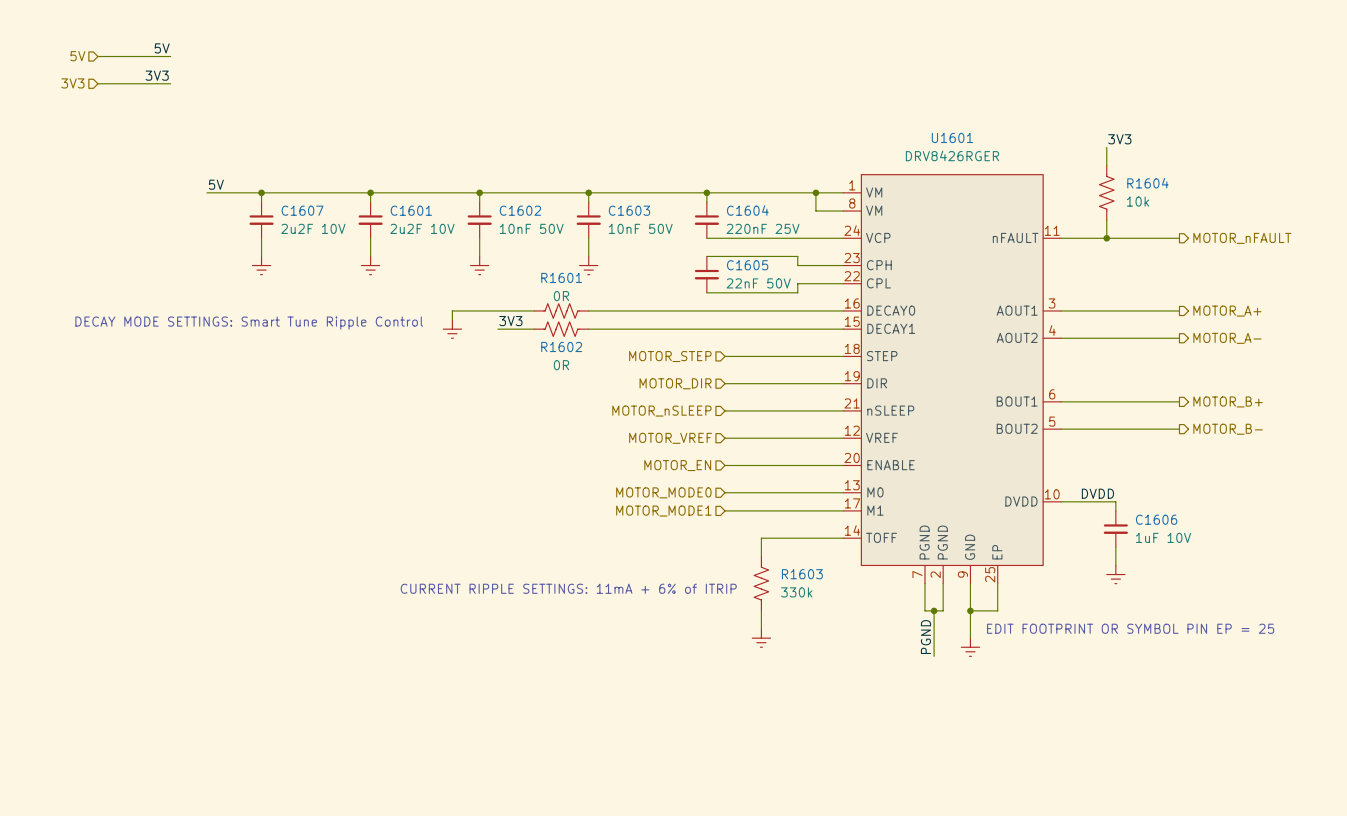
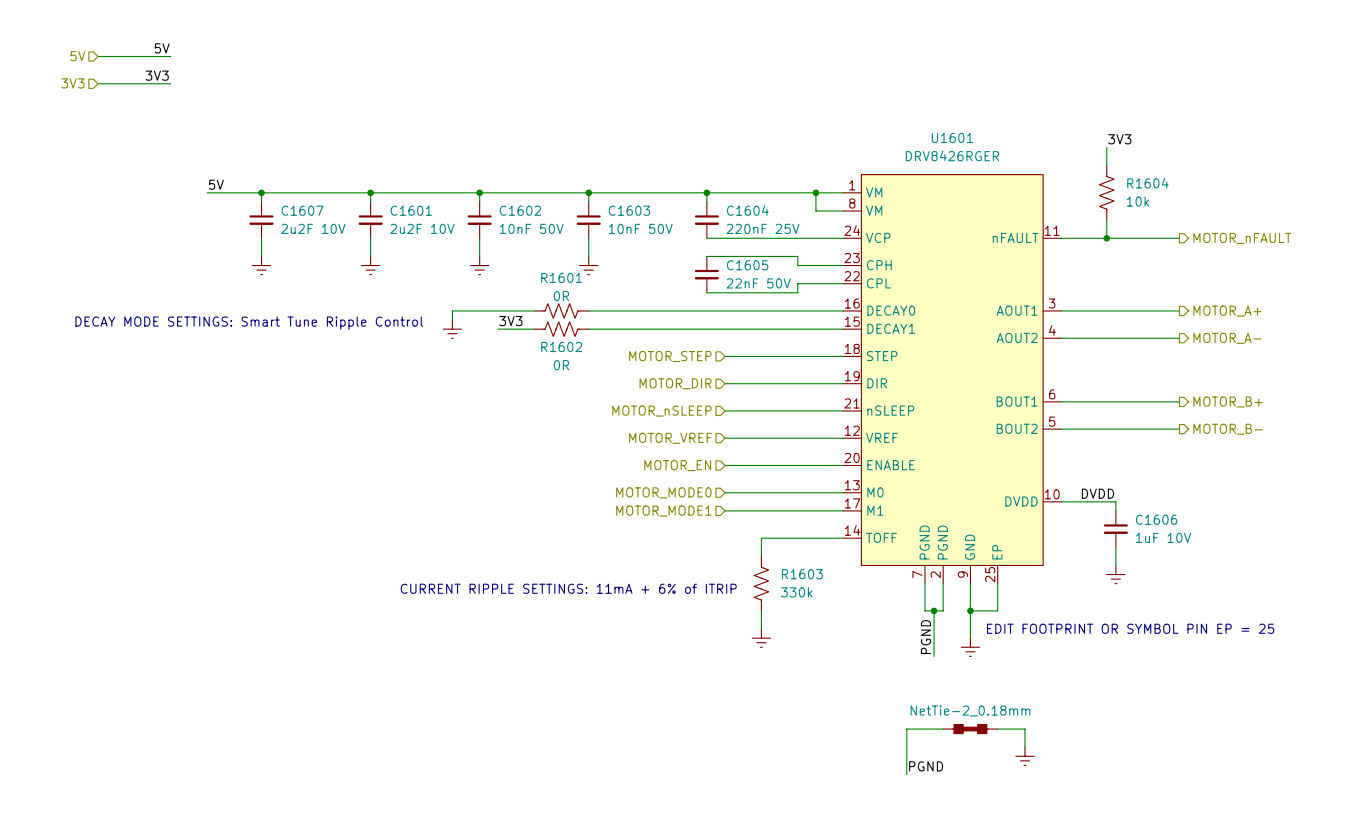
wire: none -> (943, 729) (906, 729) (906, 774)
part: none -> NetTie-2_0.18mm (970, 729)
wire: none -> (997, 729) (1024, 729) (1024, 747)
power symbol: none -> (1024, 756)
label: none -> PGND (926, 766)

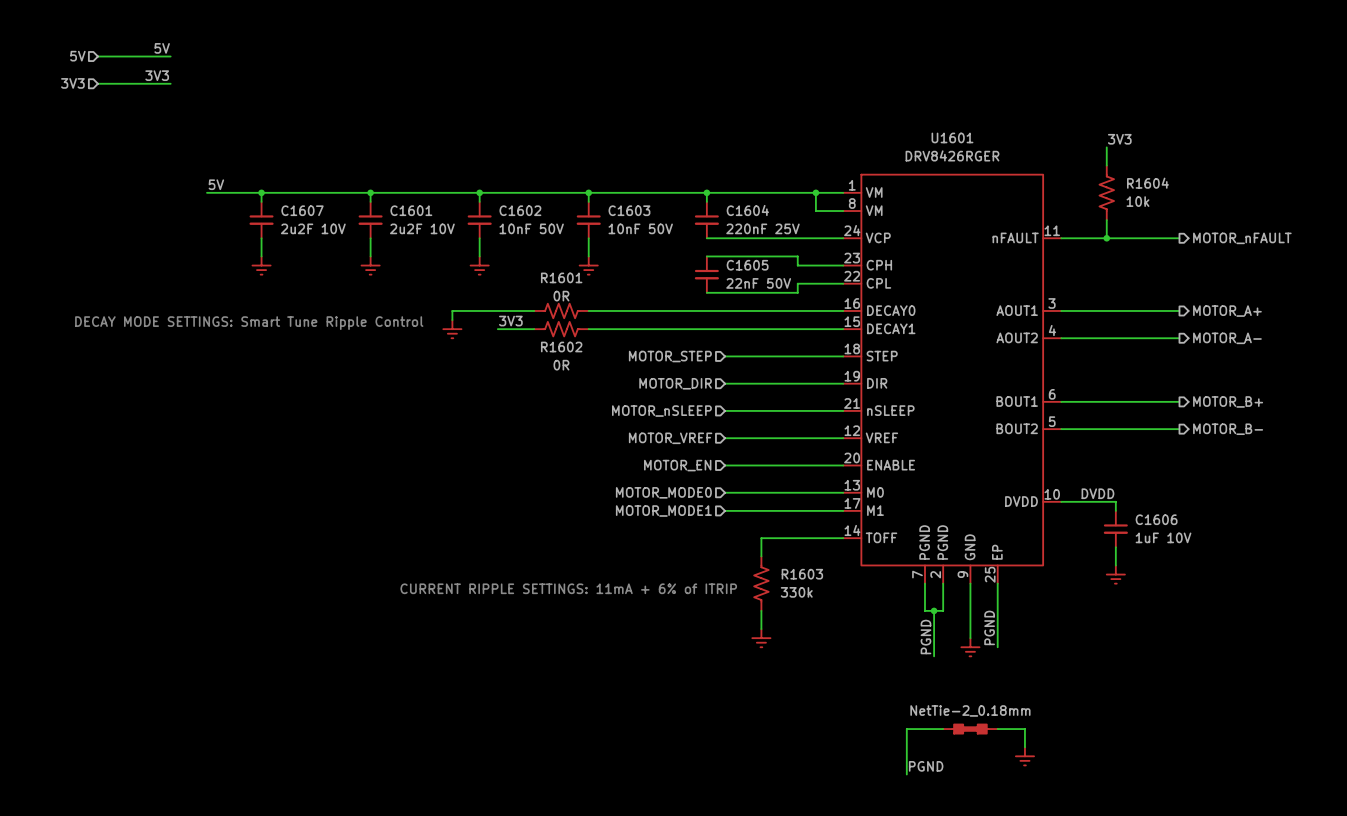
wire: (970, 610) (997, 610) -> (997, 647) (997, 610)
junction: (970, 610) -> none
label: none -> PGND (989, 627)
text: EDIT FOOTPRINT OR SYMBOL PIN EP = 25 (1130, 628) -> none

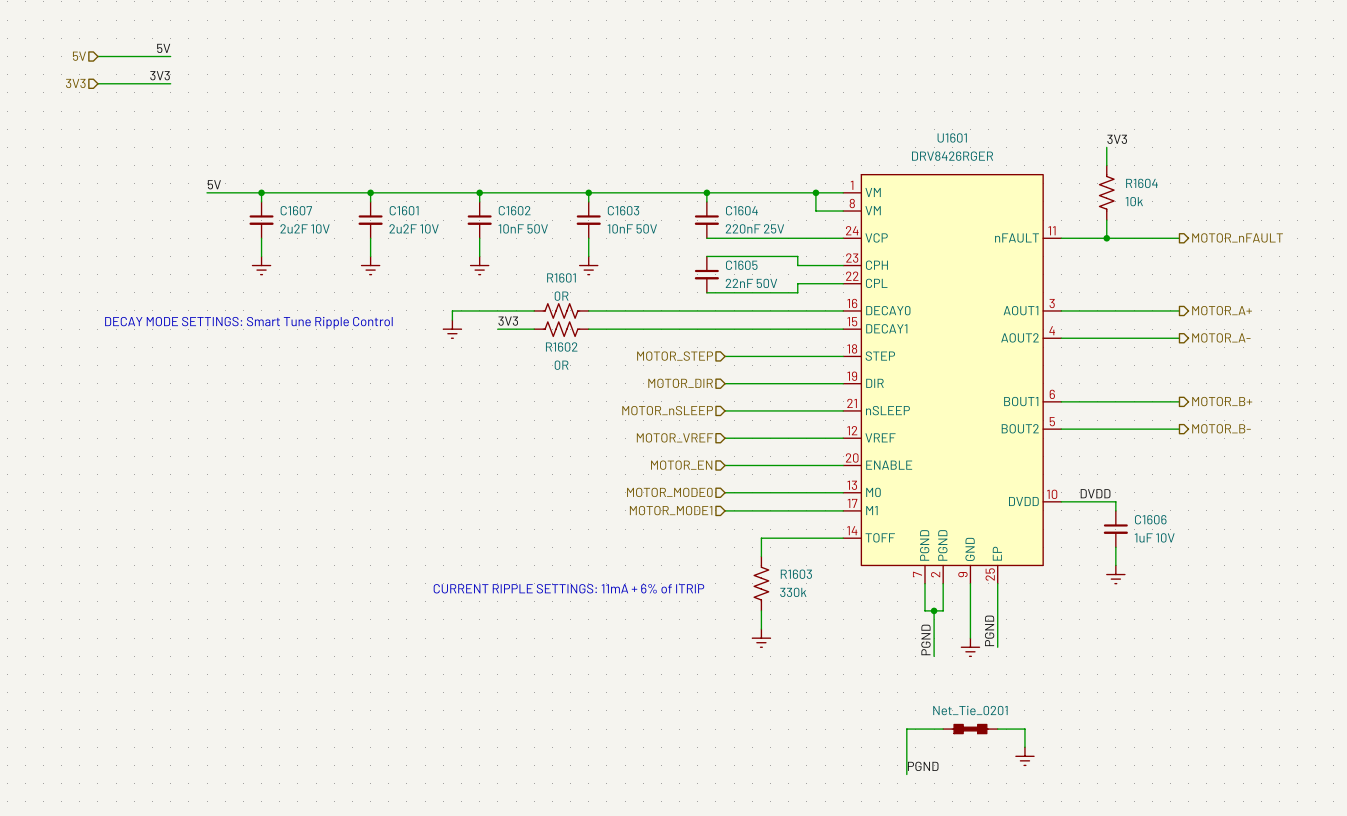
part value: NetTie-2_0.18mm (970, 710) -> Net_Tie_0201 (970, 710)

